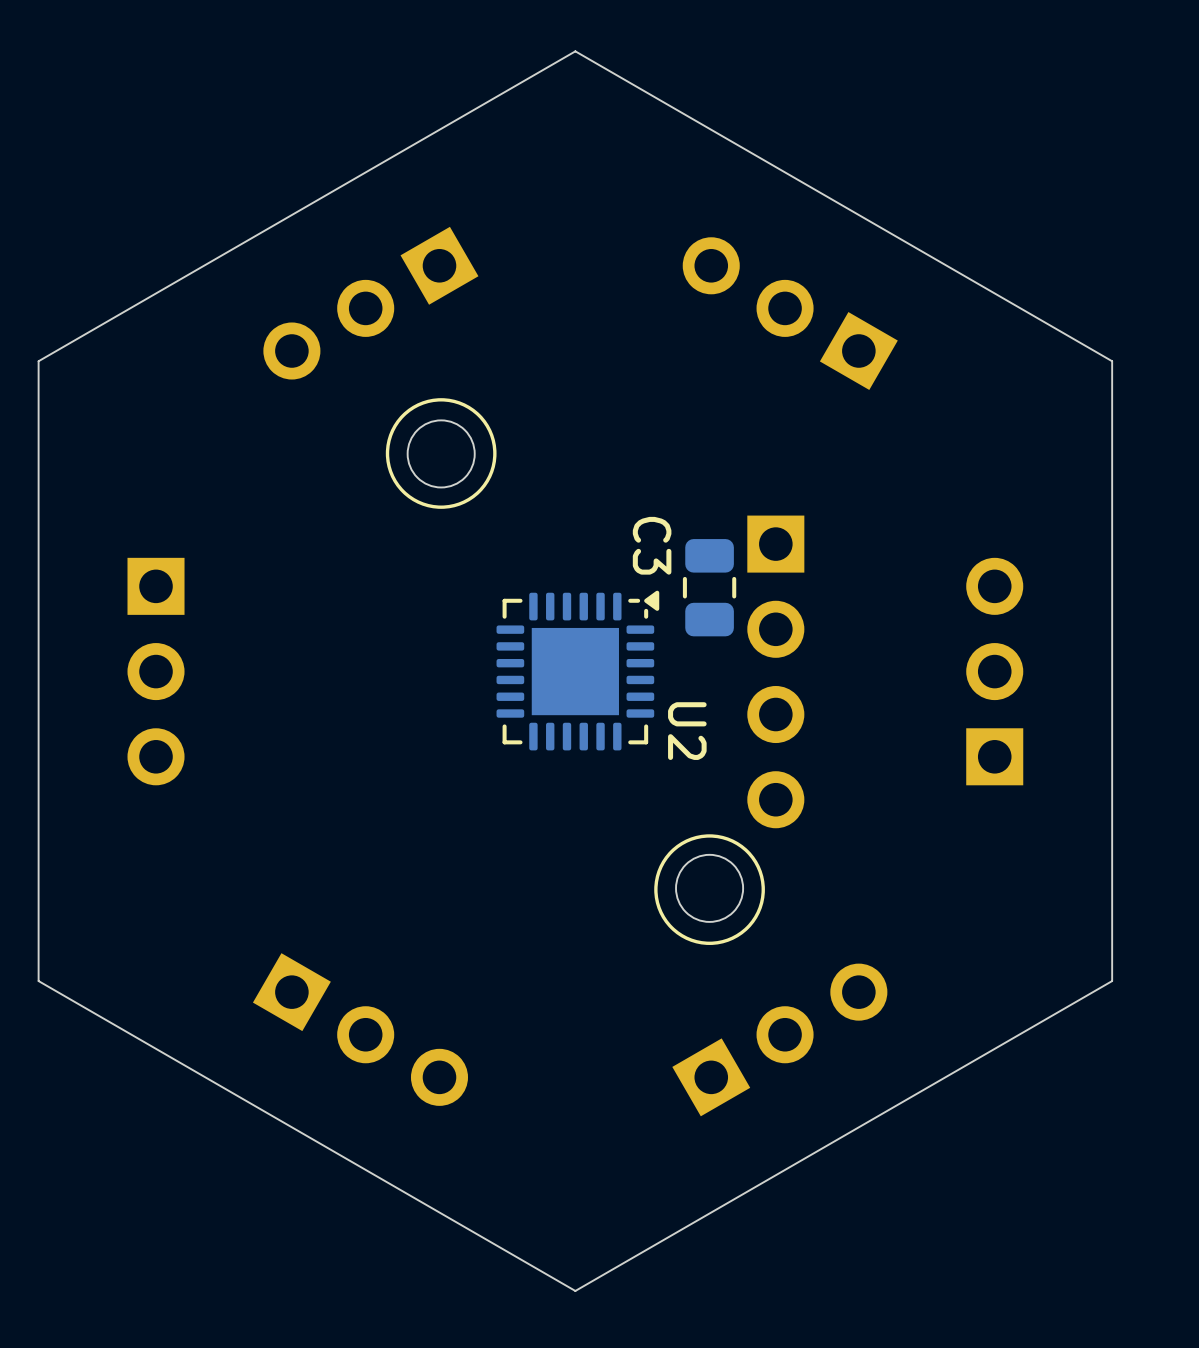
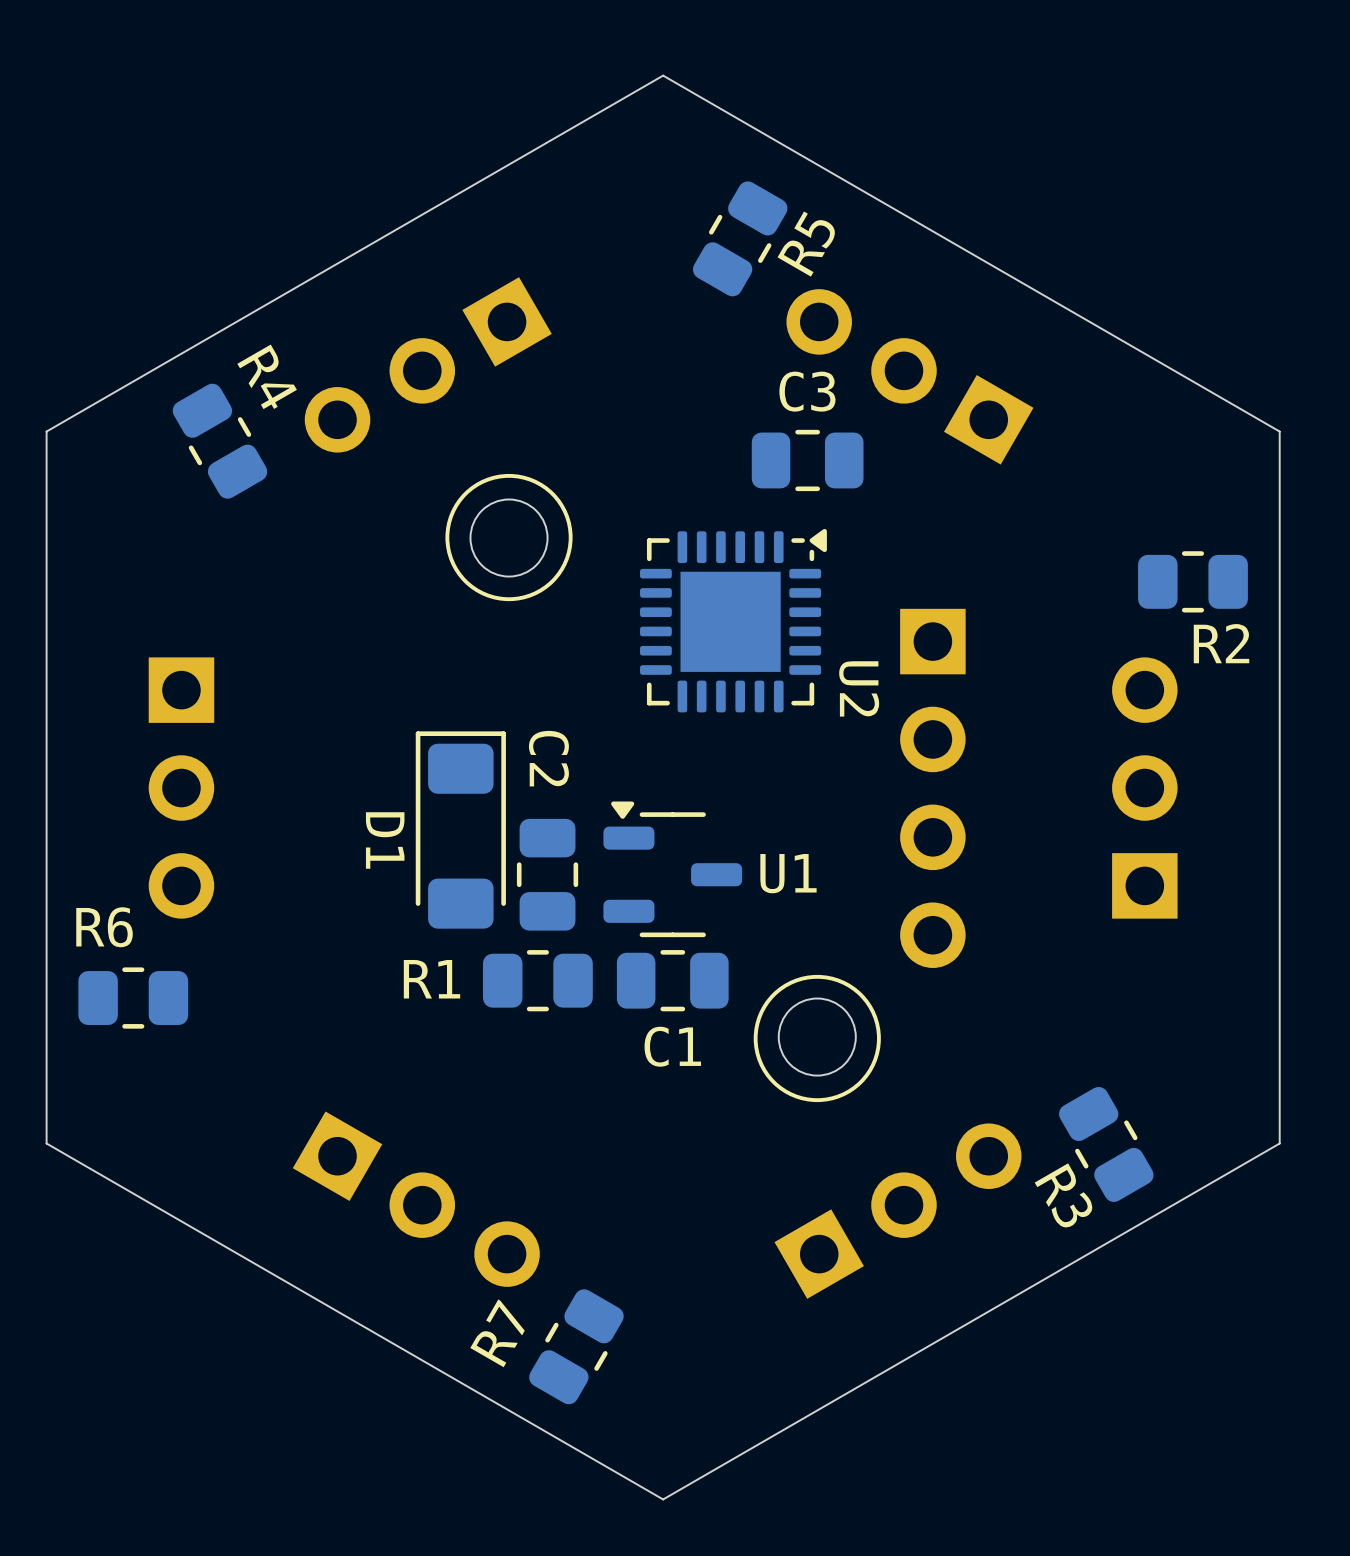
R5: none -> (740, 238)
R4: none -> (219, 441)
R2: none -> (1193, 581)
C3 rotation: 0° (709, 587) -> 90° clockwise (807, 460)
C3 position: (709, 587) -> (807, 460)
U2 position: (577, 670) -> (733, 620)
part position: (775, 671) -> (932, 788)
D1: none -> (460, 830)
U1: none -> (672, 869)
C2: none -> (547, 874)
R1: none -> (537, 980)
C1: none -> (672, 980)
R6: none -> (133, 998)
R3: none -> (1106, 1144)
R7: none -> (576, 1346)

